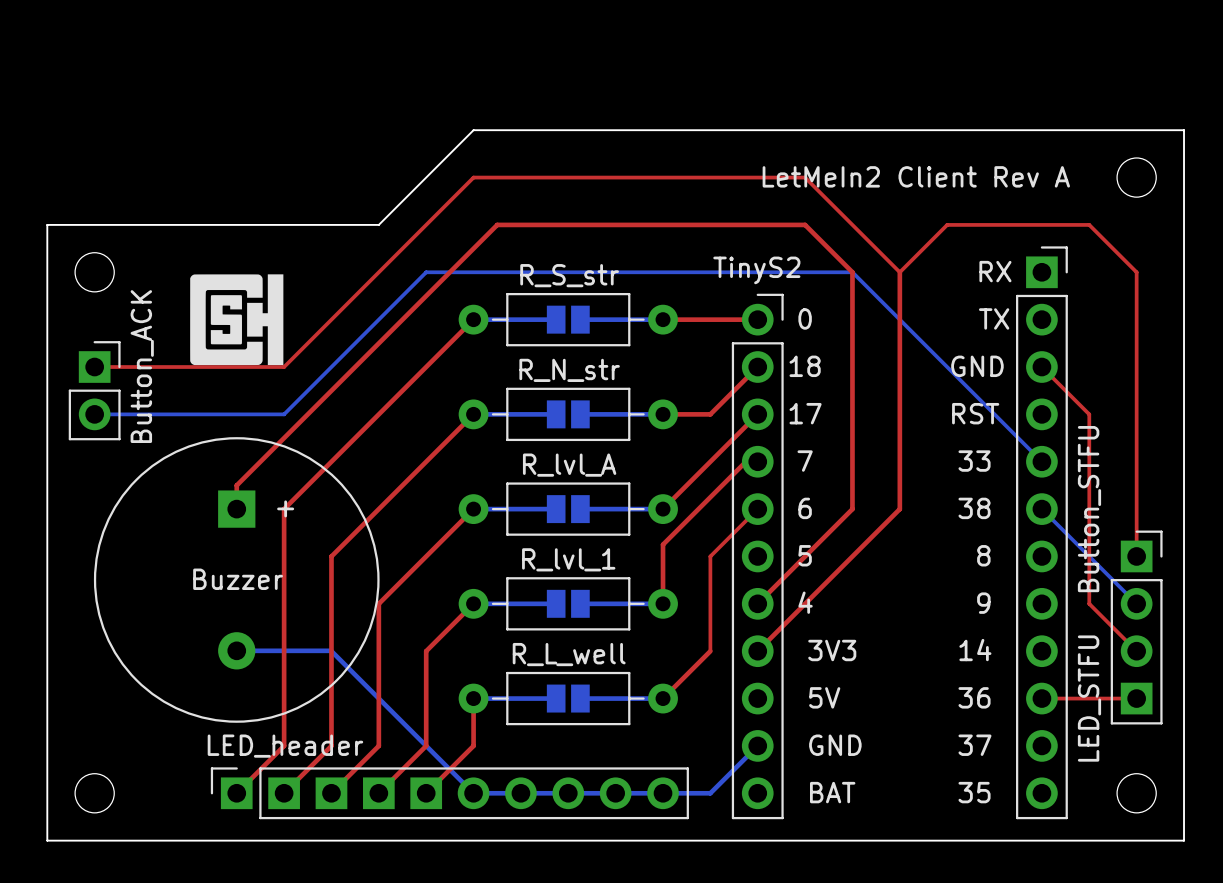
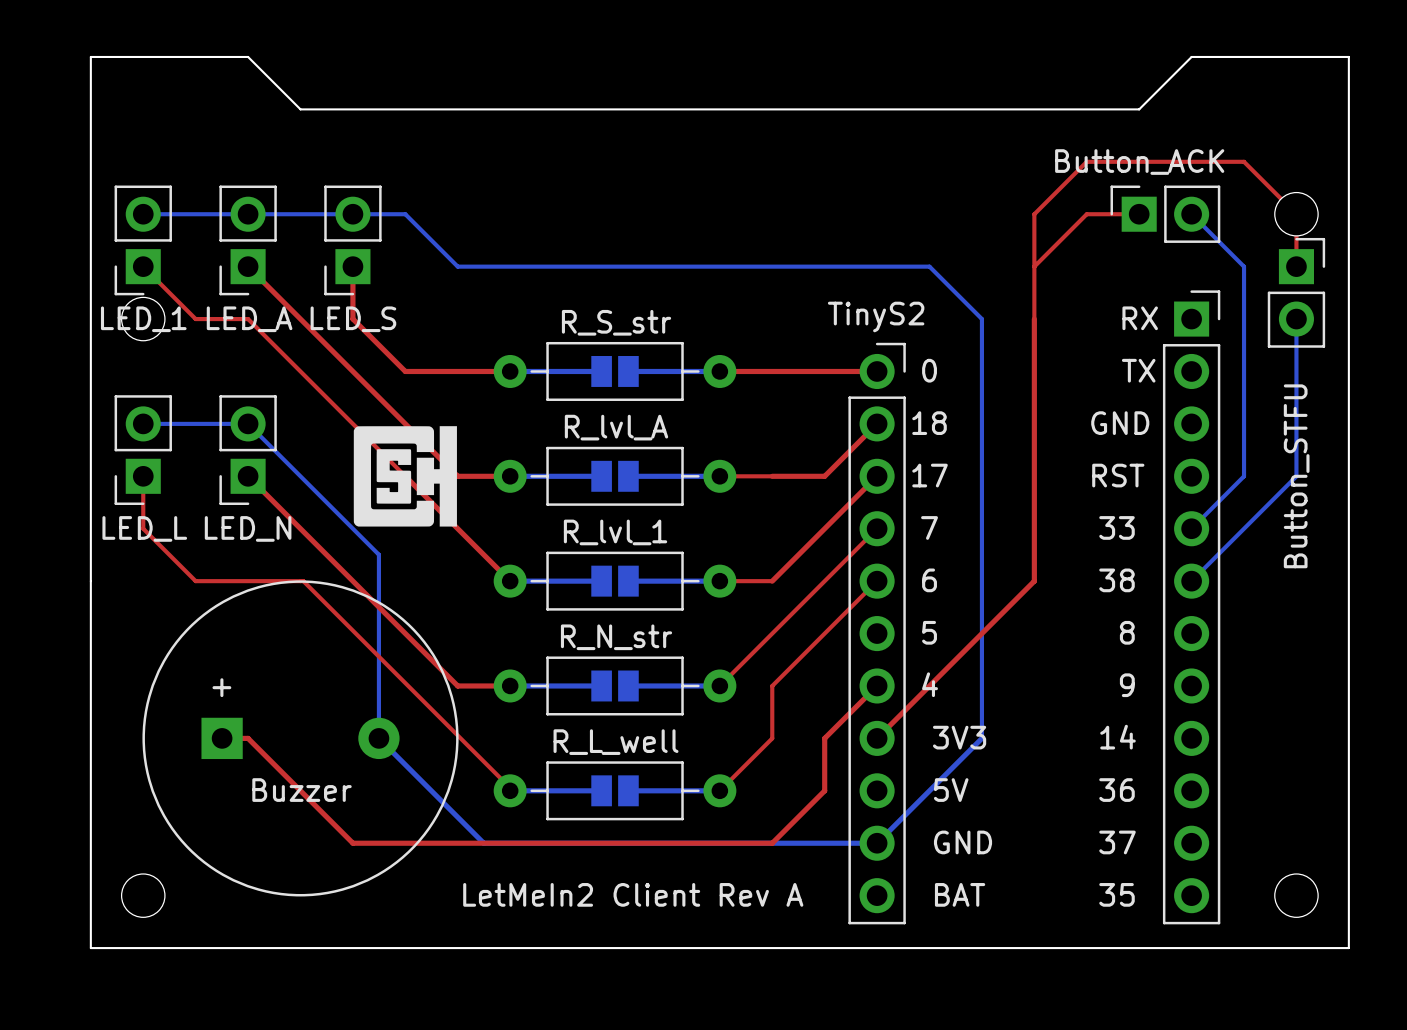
board edge: (1184, 130) (473, 130) (378, 224) (47, 224) -> (1348, 161) (1348, 56) (1191, 56) (1139, 109) (300, 109) (248, 56) (90, 56) (90, 266)
text: LetMeIn2 Client Rev A (916, 176) -> none
bottom track: none -> (143, 214) (405, 214) (457, 266) (929, 266) (981, 319) (981, 738) (877, 843) (483, 843) (378, 738) (378, 554) (248, 423) (143, 423)
top track: none -> (1139, 214) (1086, 214) (1034, 266)
Button_ACK: none -> (1165, 214)
LED_1: none -> (143, 240)
LED_A: none -> (248, 240)
LED_S: none -> (352, 240)
top track: none -> (143, 266) (195, 319) (248, 319) (510, 581)
top track: none -> (248, 266) (457, 476) (510, 476)
top track: none -> (352, 266) (352, 319) (405, 371) (510, 371)
top track: none -> (1296, 266) (1296, 214) (1244, 161) (1086, 161) (1034, 214) (1034, 319)
Button_STFU: none -> (1296, 292)
drawing position: (236, 319) -> (405, 476)
top track: (473, 319) (284, 509) (284, 745) (236, 793) -> none
bottom track: (508, 319) (533, 319) -> (654, 371) (680, 371)
part position: (568, 319) -> (615, 371)
R_S_str position: (568, 319) -> (615, 371)
top track: none -> (719, 371) (772, 371)
bottom track: (615, 319) (663, 319) -> (510, 371) (562, 371)
top track: (94, 367) (284, 367) (473, 177) (805, 177) (899, 272) (947, 224) (1089, 224) (1136, 272) (1136, 556) -> none
top track: (1041, 367) (1089, 414) (1089, 603) (1136, 651) -> none
Button_ACK: (94, 390) -> none
LED_L: none -> (143, 450)
LED_N: none -> (248, 450)
top track: none -> (143, 476) (143, 528) (195, 581) (303, 581) (513, 790)
bottom track: (94, 414) (284, 414) (426, 272) (852, 272) (1041, 461) -> (1191, 214) (1244, 266) (1244, 476) (1191, 528)
top track: none -> (248, 476) (457, 685) (510, 685)
top track: (473, 414) (331, 556) (331, 745) (284, 793) -> none
bottom track: (508, 414) (533, 414) -> (654, 476) (680, 476)
part position: (568, 414) -> (615, 476)
R_N_str position: (568, 414) -> (615, 685)
top track: none -> (719, 476) (772, 476)
bottom track: (615, 414) (663, 414) -> (510, 476) (562, 476)
top track: (757, 461) (745, 461) (663, 544) (663, 603) -> (877, 528) (719, 685)
top track: (236, 509) (236, 485) (497, 224) (805, 224) (852, 272) (852, 509) (757, 603) -> (222, 738) (248, 738) (352, 843) (772, 843) (824, 790) (824, 738) (877, 685)
top track: (473, 509) (378, 603) (378, 745) (331, 793) -> none
bottom track: (508, 509) (533, 509) -> (654, 581) (680, 581)
part position: (568, 509) -> (615, 581)
R_lvl_A position: (568, 509) -> (615, 476)
top track: none -> (719, 581) (772, 581)
bottom track: (615, 509) (663, 509) -> (510, 581) (562, 581)
bottom track: (1041, 509) (1136, 603) -> (1191, 581) (1296, 476) (1296, 319)
text: Button_STFU (1089, 509) -> none
top track: (710, 556) (710, 651) (663, 698) -> (824, 633) (772, 685) (772, 738) (719, 790)
Buzzer rotation: 0° (236, 579) -> 90° counterclockwise (300, 738)
Buzzer name position: Buzzer (238, 579) -> Buzzer (301, 790)
top track: (473, 603) (426, 651) (426, 745) (378, 793) -> none
bottom track: (508, 603) (533, 603) -> (654, 685) (680, 685)
R_lvl_1 position: (568, 603) -> (615, 581)
part position: (568, 603) -> (615, 685)
bottom track: (615, 603) (663, 603) -> (510, 685) (562, 685)
LED_STFU: (1136, 627) -> none
bottom track: (236, 650) (331, 650) (473, 793) (710, 793) (757, 745) -> none
top track: (473, 698) (473, 745) (426, 793) -> none
bottom track: (508, 698) (533, 698) -> (654, 790) (680, 790)
part position: (568, 698) -> (615, 790)
R_L_well position: (568, 698) -> (615, 790)
bottom track: (615, 698) (663, 698) -> (510, 790) (562, 790)
top track: (1041, 698) (1136, 698) -> none
text: none -> LetMeIn2 Client Rev A (633, 894)
LED_header: (449, 793) -> none

